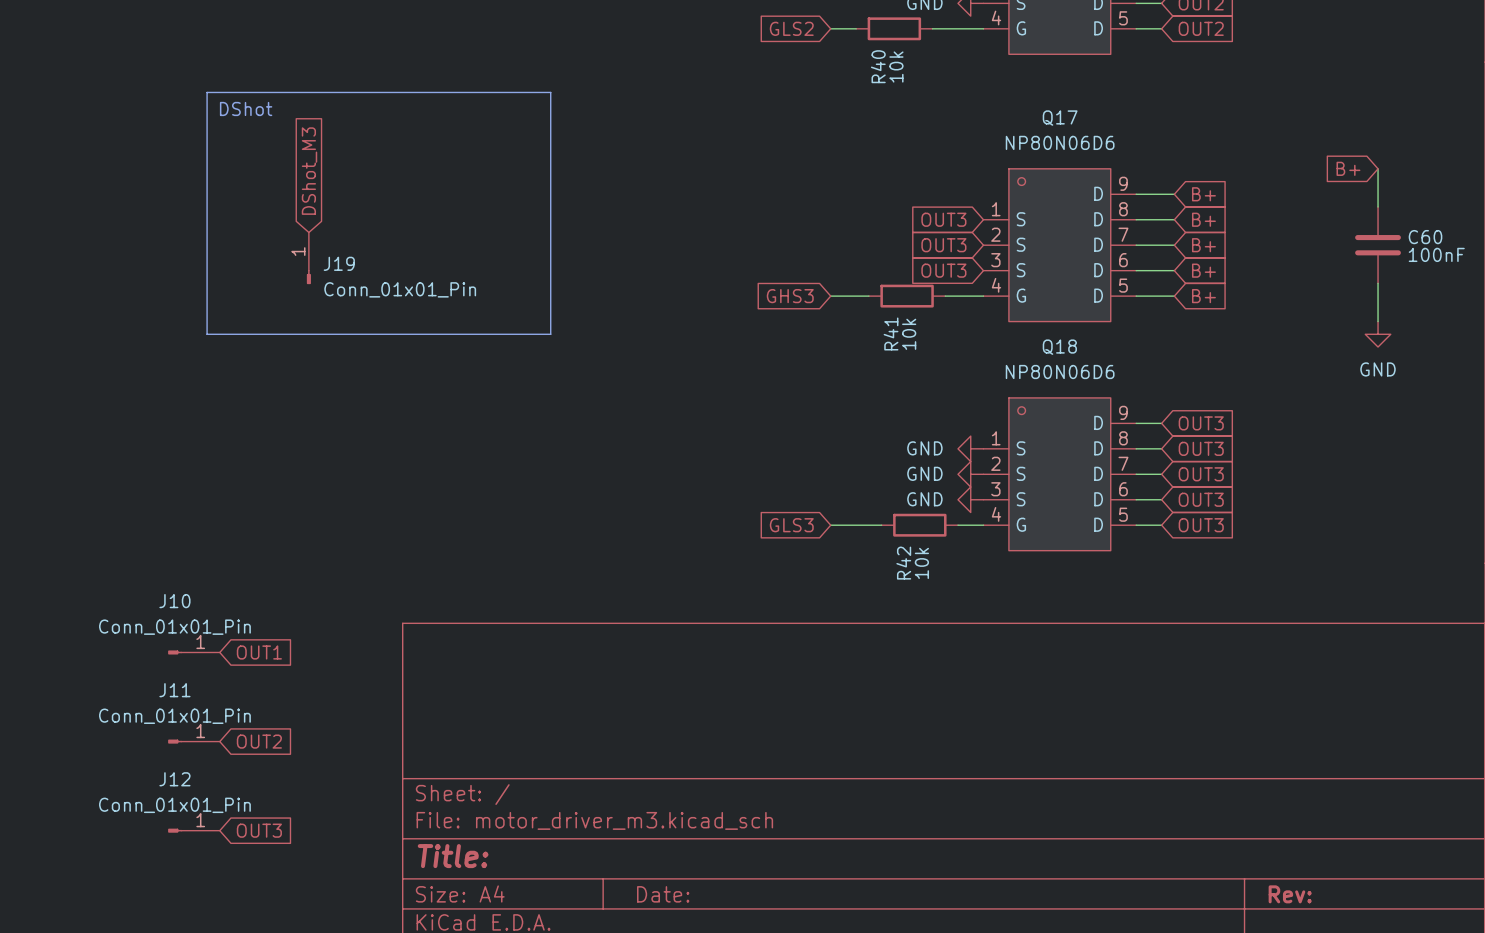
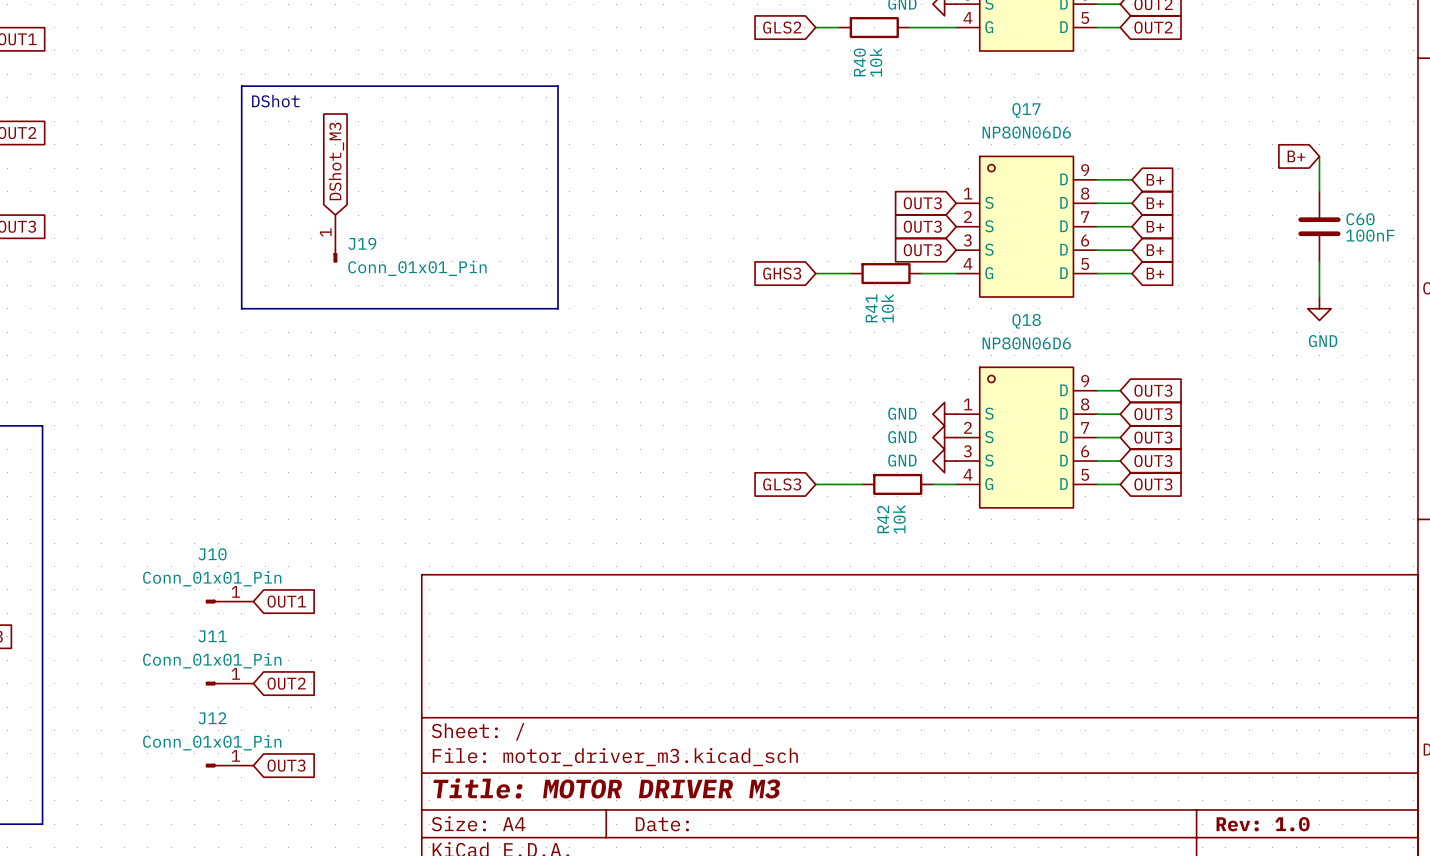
title block: Title: (453, 856) -> Title: MOTOR DRIVER M3 (606, 788)
title block: Rev: (1290, 894) -> Rev: 1.0 (1263, 824)

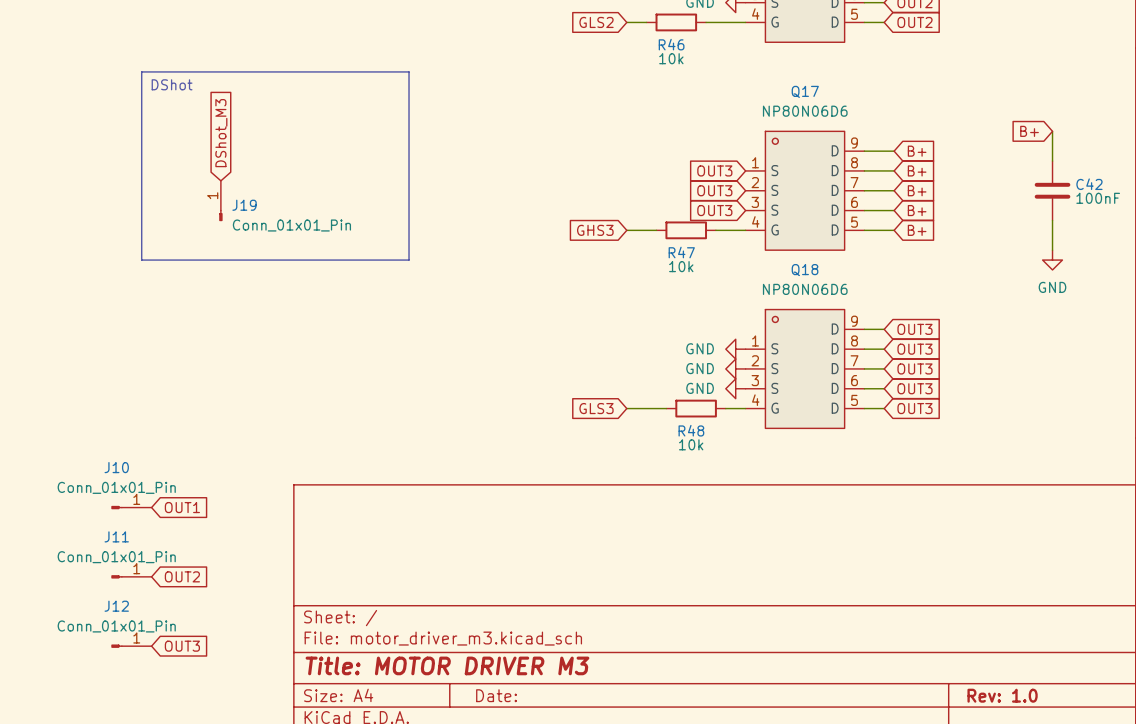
R40 name: R40 (859, 62) -> R46 (671, 44)
R40 value rotation: 0° (875, 62) -> 90° clockwise (671, 58)
C60 name: C60 (1360, 219) -> C42 (1089, 184)
R41 name: R41 (871, 308) -> R47 (681, 252)
R41 value rotation: 0° (887, 308) -> 90° clockwise (681, 266)
R42 name: R42 (883, 519) -> R48 (691, 430)
R42 value rotation: 0° (899, 519) -> 90° clockwise (691, 444)

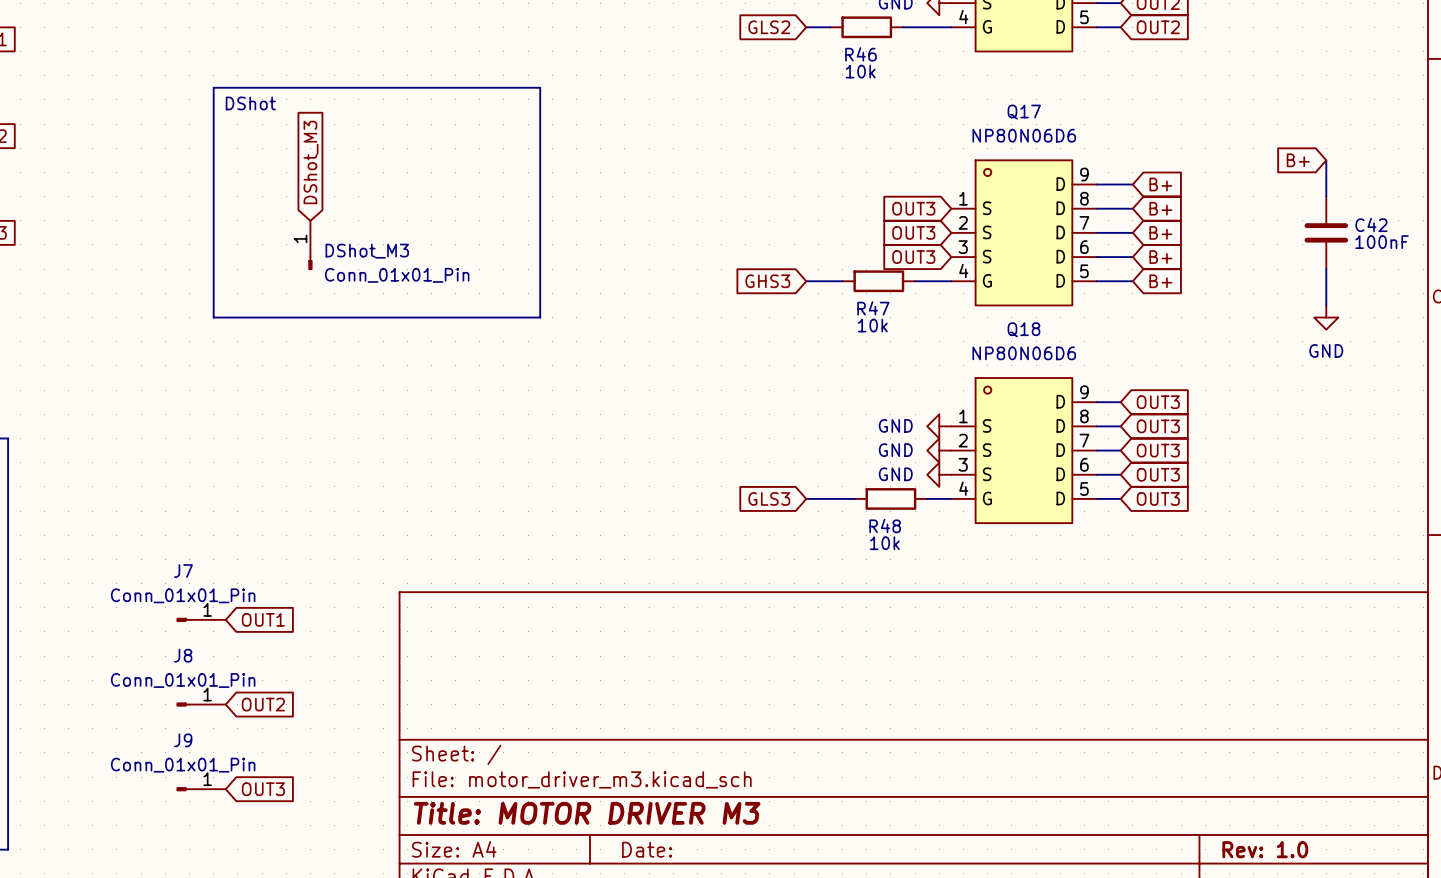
J19 name: J19 (244, 205) -> DShot_M3 (367, 251)
J10 name: J10 (116, 467) -> J7 (183, 571)
J11 name: J11 (116, 536) -> J8 (183, 655)
J12 name: J12 (116, 606) -> J9 (183, 740)

